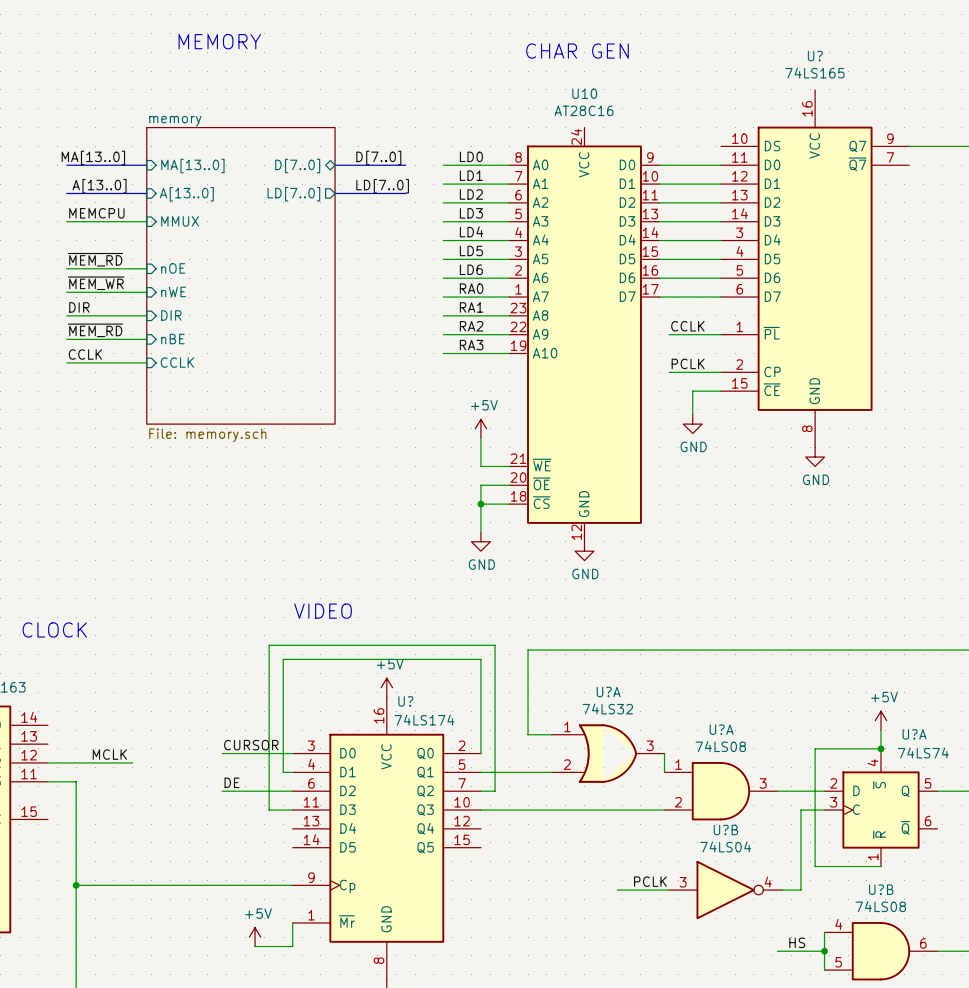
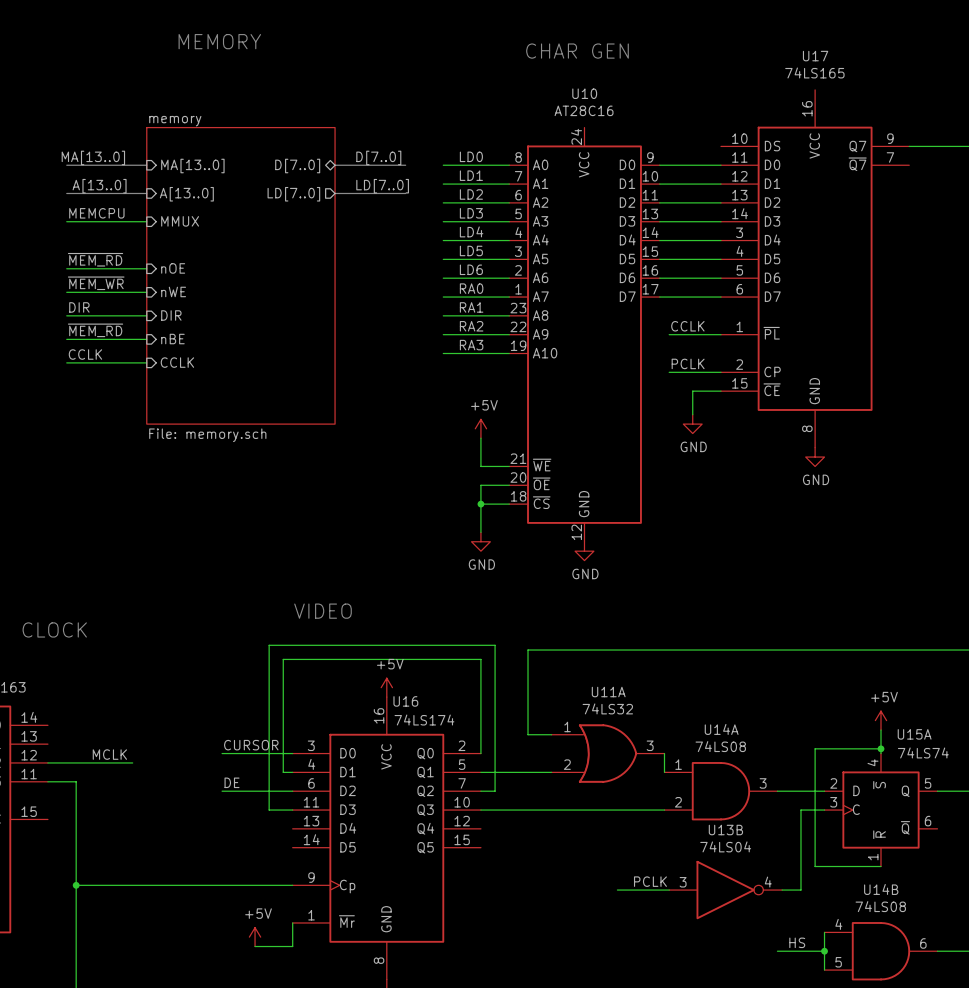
U? name: U? (815, 56) -> U17 (815, 56)
U?A name: U?A (608, 692) -> U11A (608, 692)
U? name: U? (405, 701) -> U16 (405, 701)
U?A name: U?A (721, 729) -> U14A (721, 729)
U?A name: U?A (914, 734) -> U15A (914, 734)
U?B name: U?B (725, 830) -> U13B (725, 830)
U?B name: U?B (881, 889) -> U14B (881, 889)

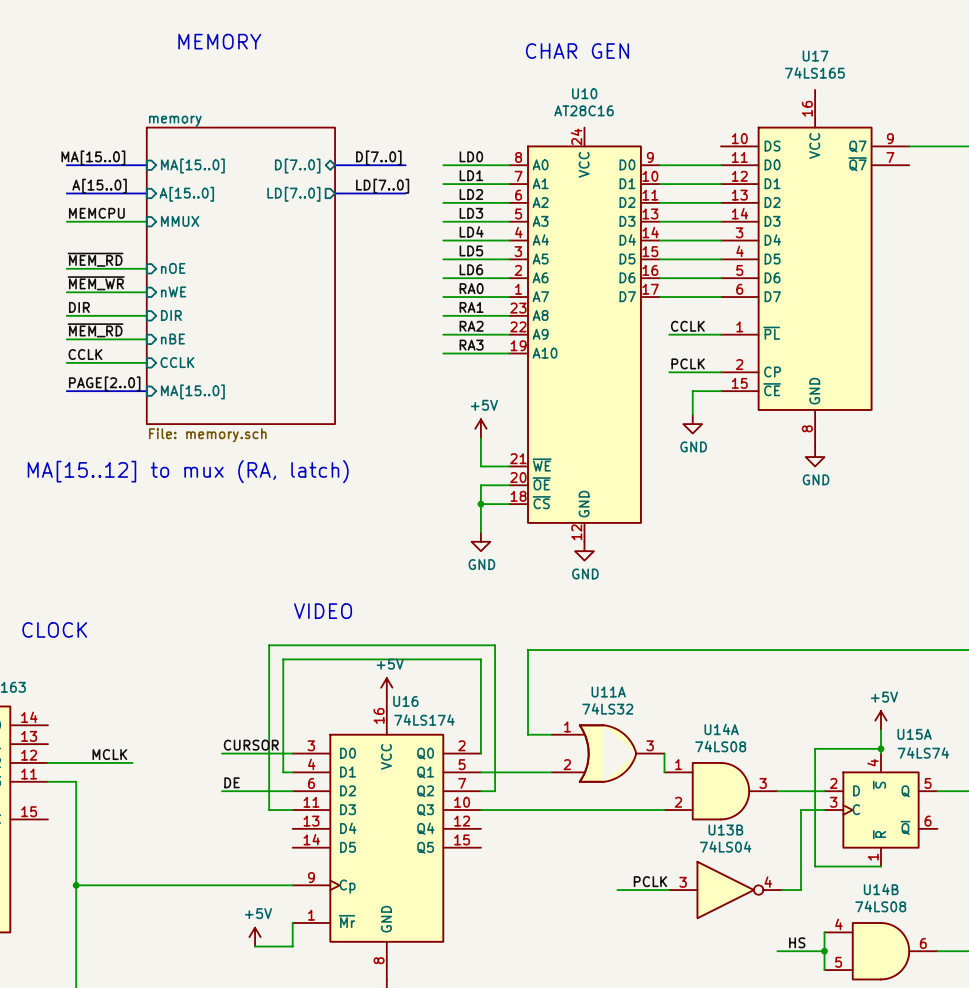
label: MA[13..0] (93, 157) -> MA[15..0] (93, 157)
sheet pin: MA[13..0] (192, 166) -> MA[15..0] (192, 166)
label: A[13..0] (99, 186) -> A[15..0] (99, 186)
sheet pin: A[13..0] (186, 194) -> A[15..0] (186, 194)
label: none -> PAGE[2..0] (104, 383)
bus: none -> (66, 391) (146, 391)
sheet pin: none -> MA[15..0] (192, 391)
text: none -> MA[15..12] to mux (RA, latch) (188, 471)

